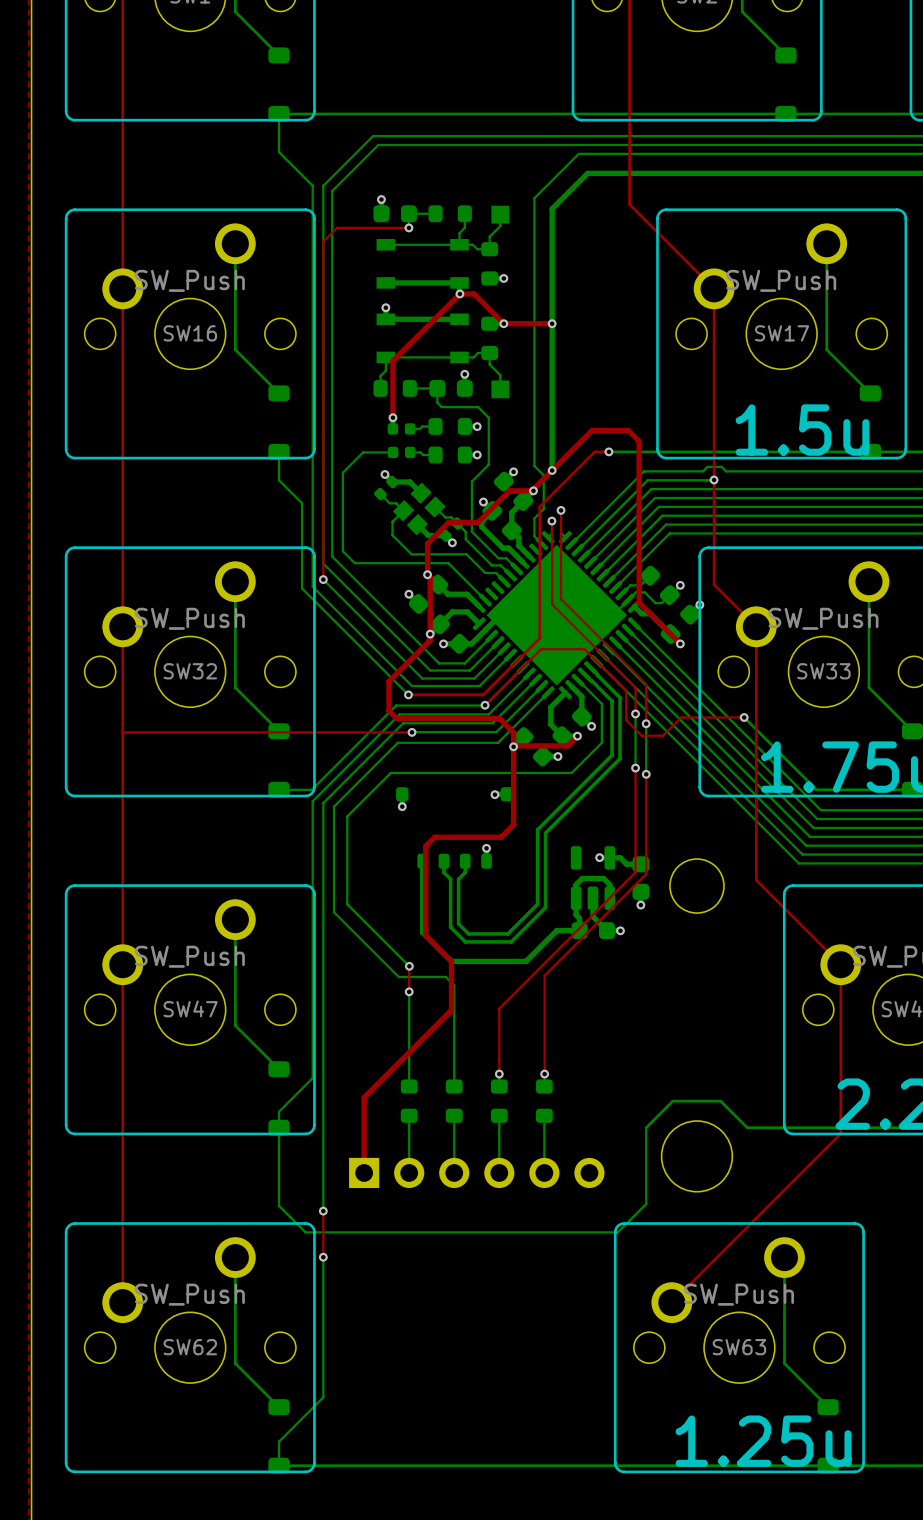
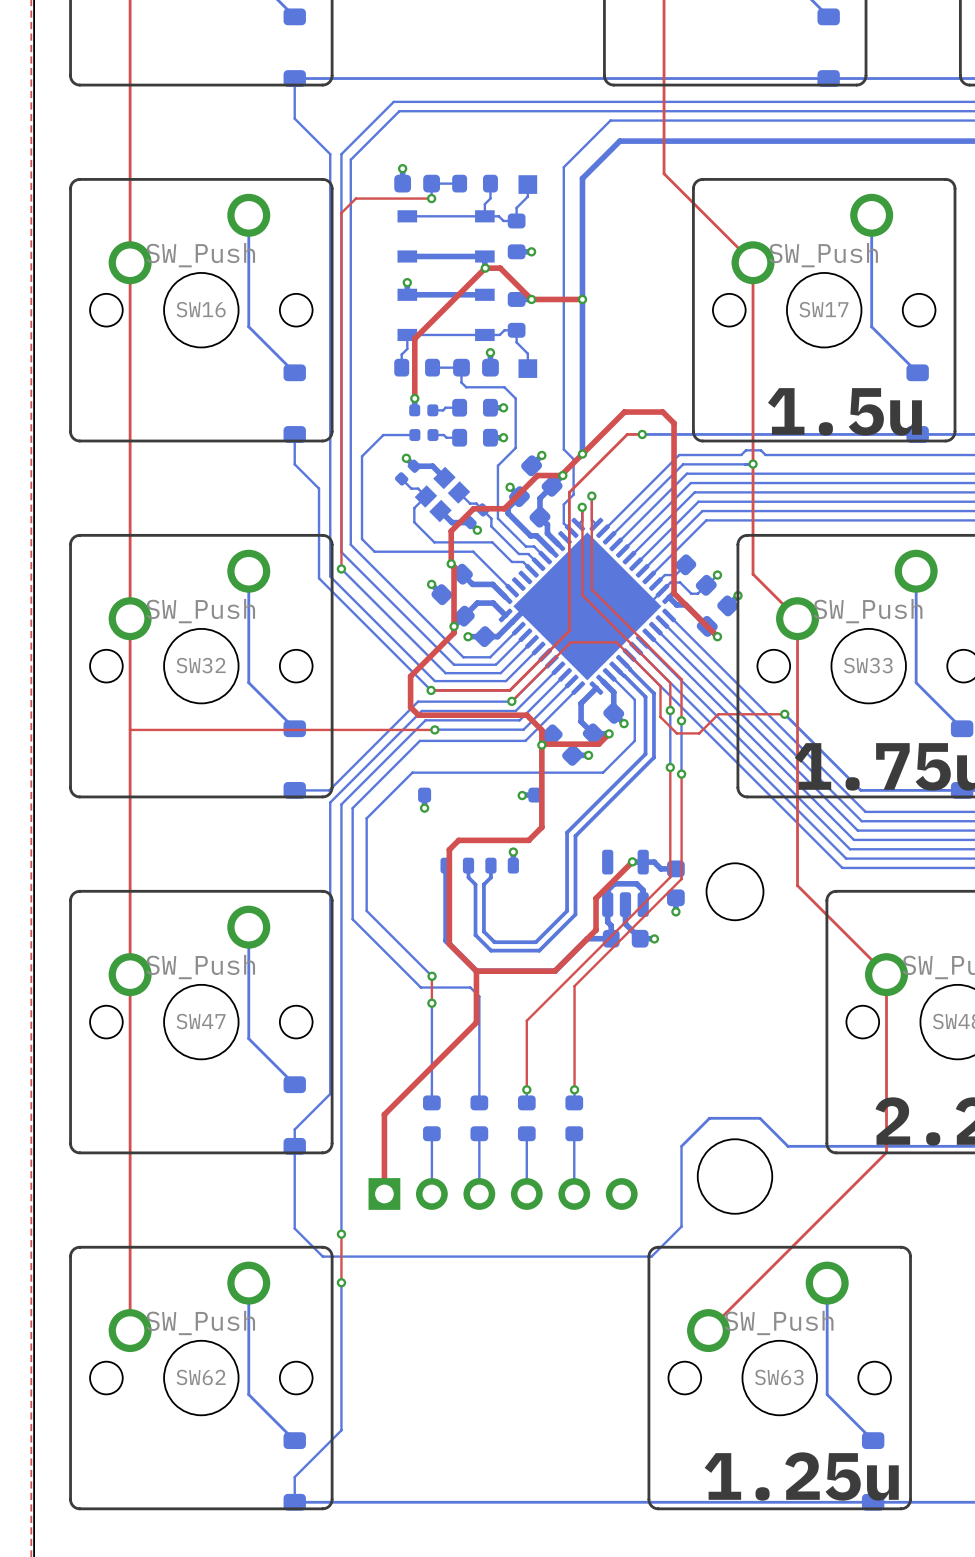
top track: none -> (632, 861) (596, 898) (596, 930) (554, 971) (476, 971)

